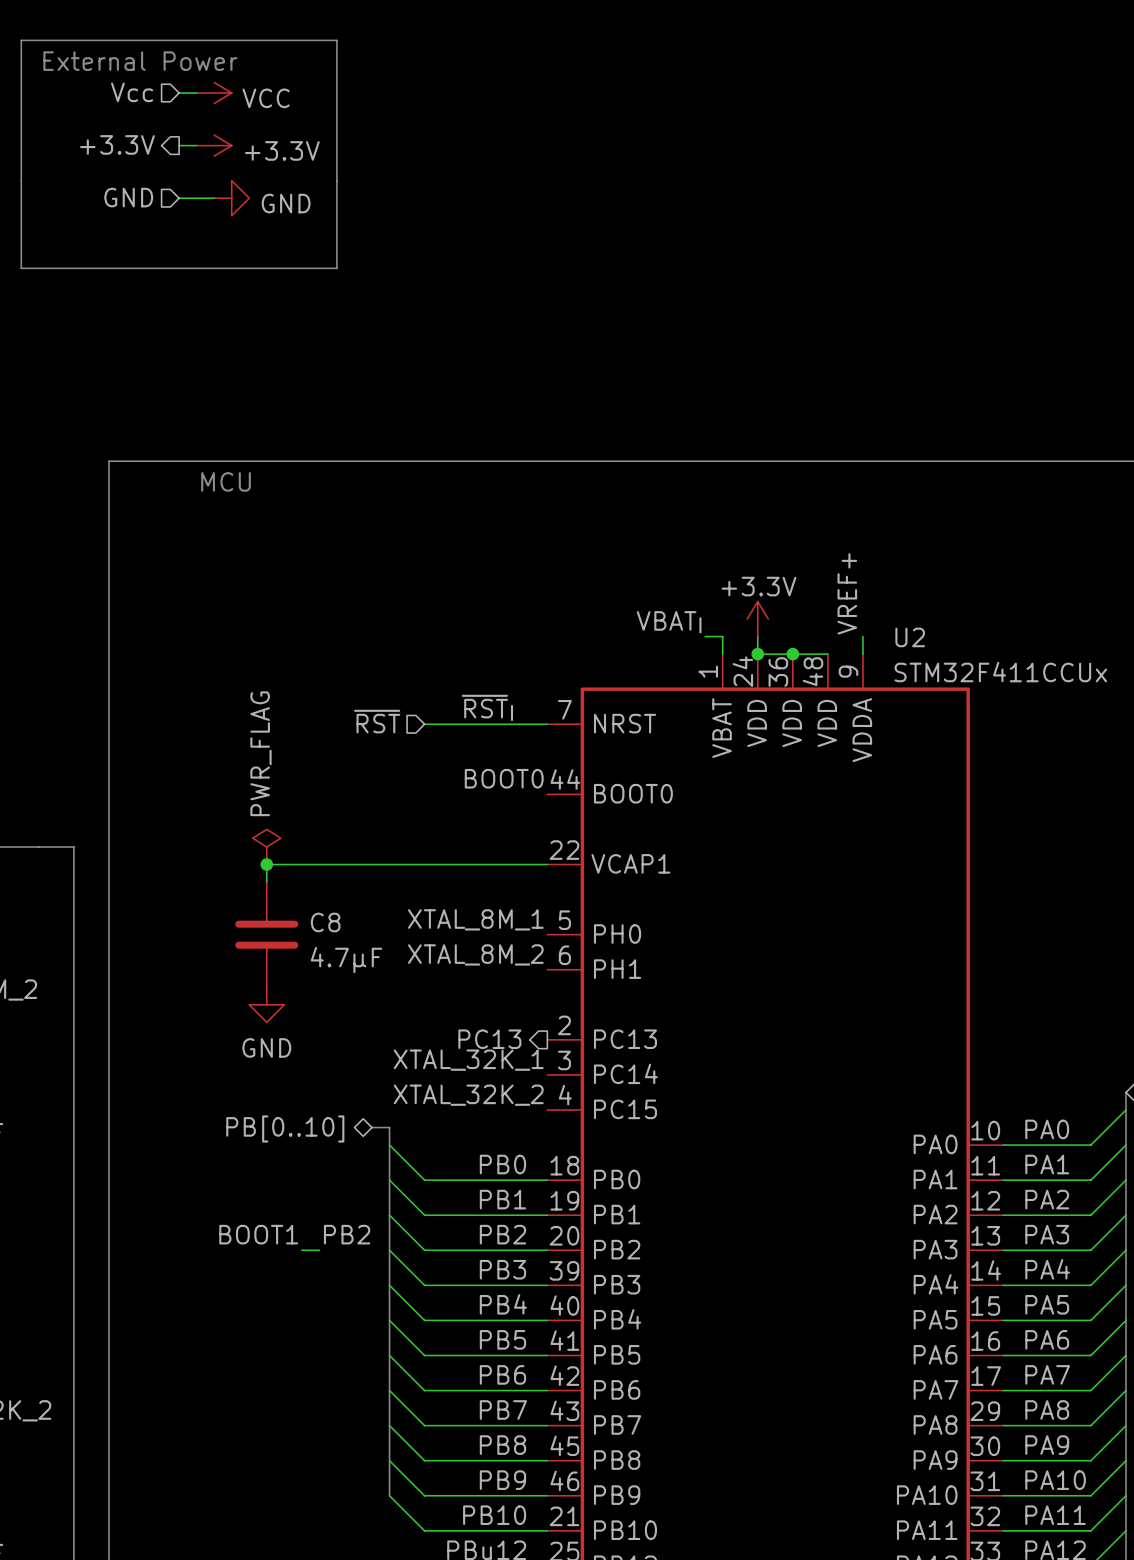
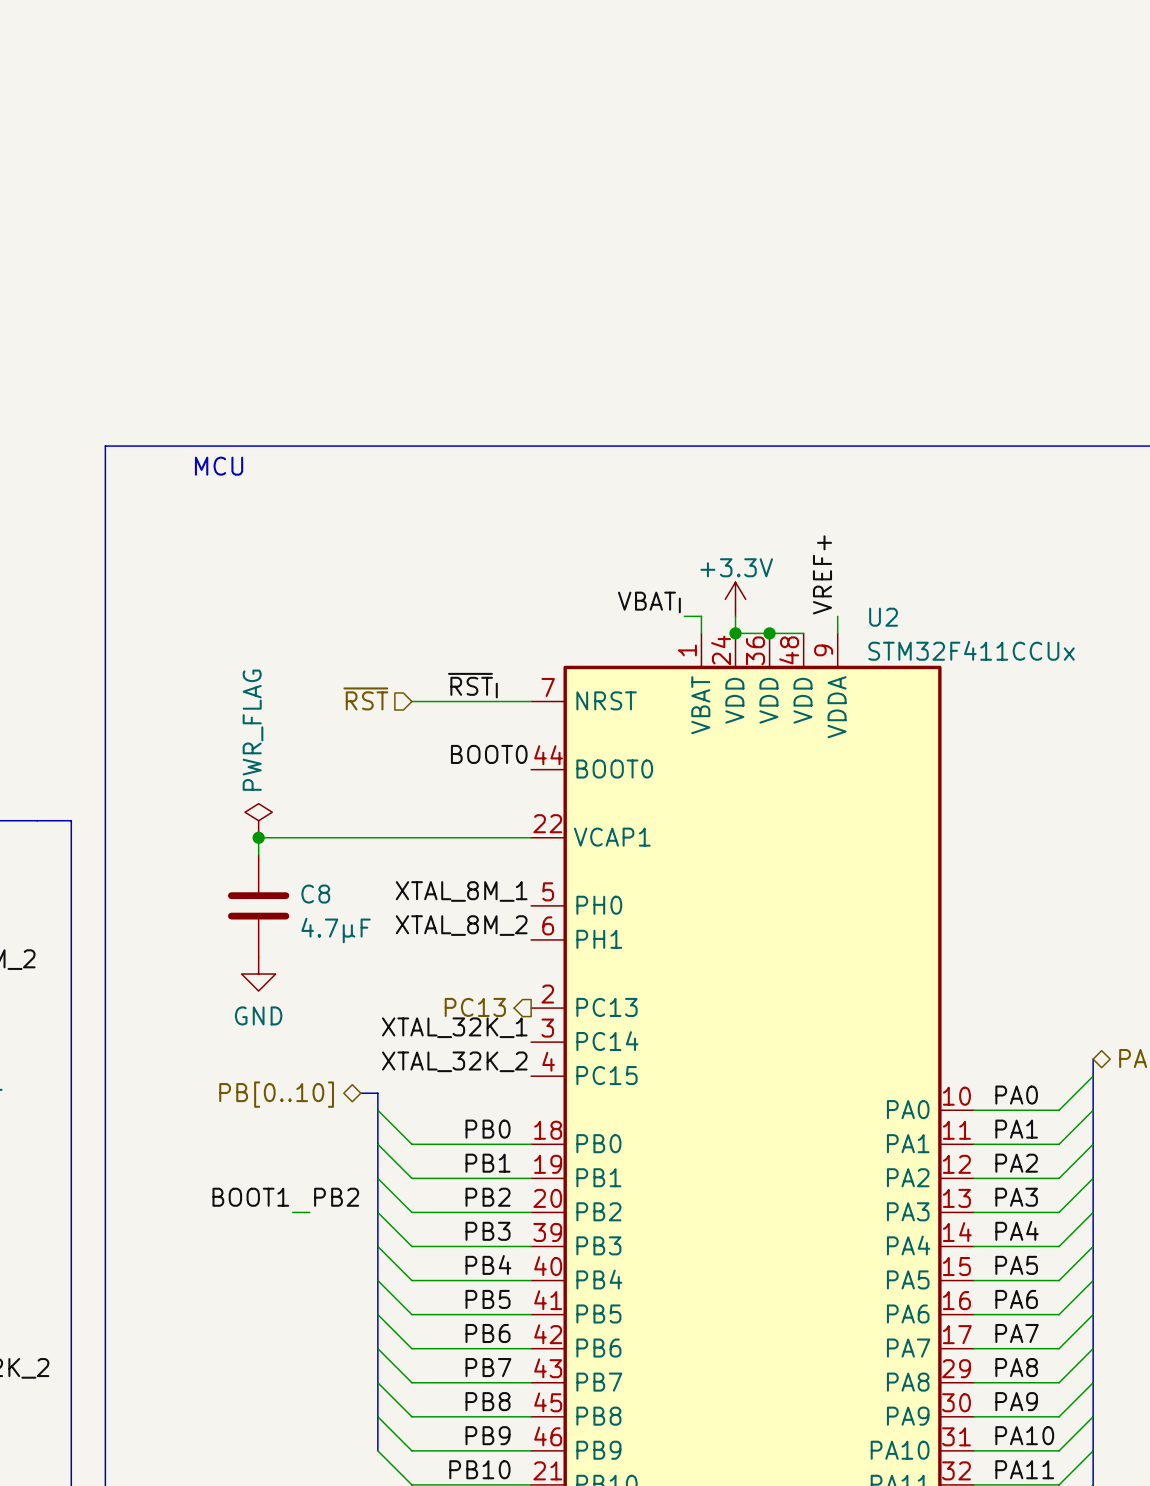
line: (21, 40) (21, 268) (336, 268) (336, 40) (21, 40) -> none
text: External Power (140, 61) -> none
hierarchical label: Vcc (132, 92) -> none
wire: (179, 93) (196, 93) -> none
power symbol: VCC (214, 93) -> none
hierarchical label: +3.3V (117, 144) -> none
wire: (179, 145) (196, 145) -> none
power symbol: +3.3V (214, 145) -> none
hierarchical label: GND (128, 197) -> none
wire: (179, 198) (214, 198) -> none
power symbol: GND (231, 198) -> none

